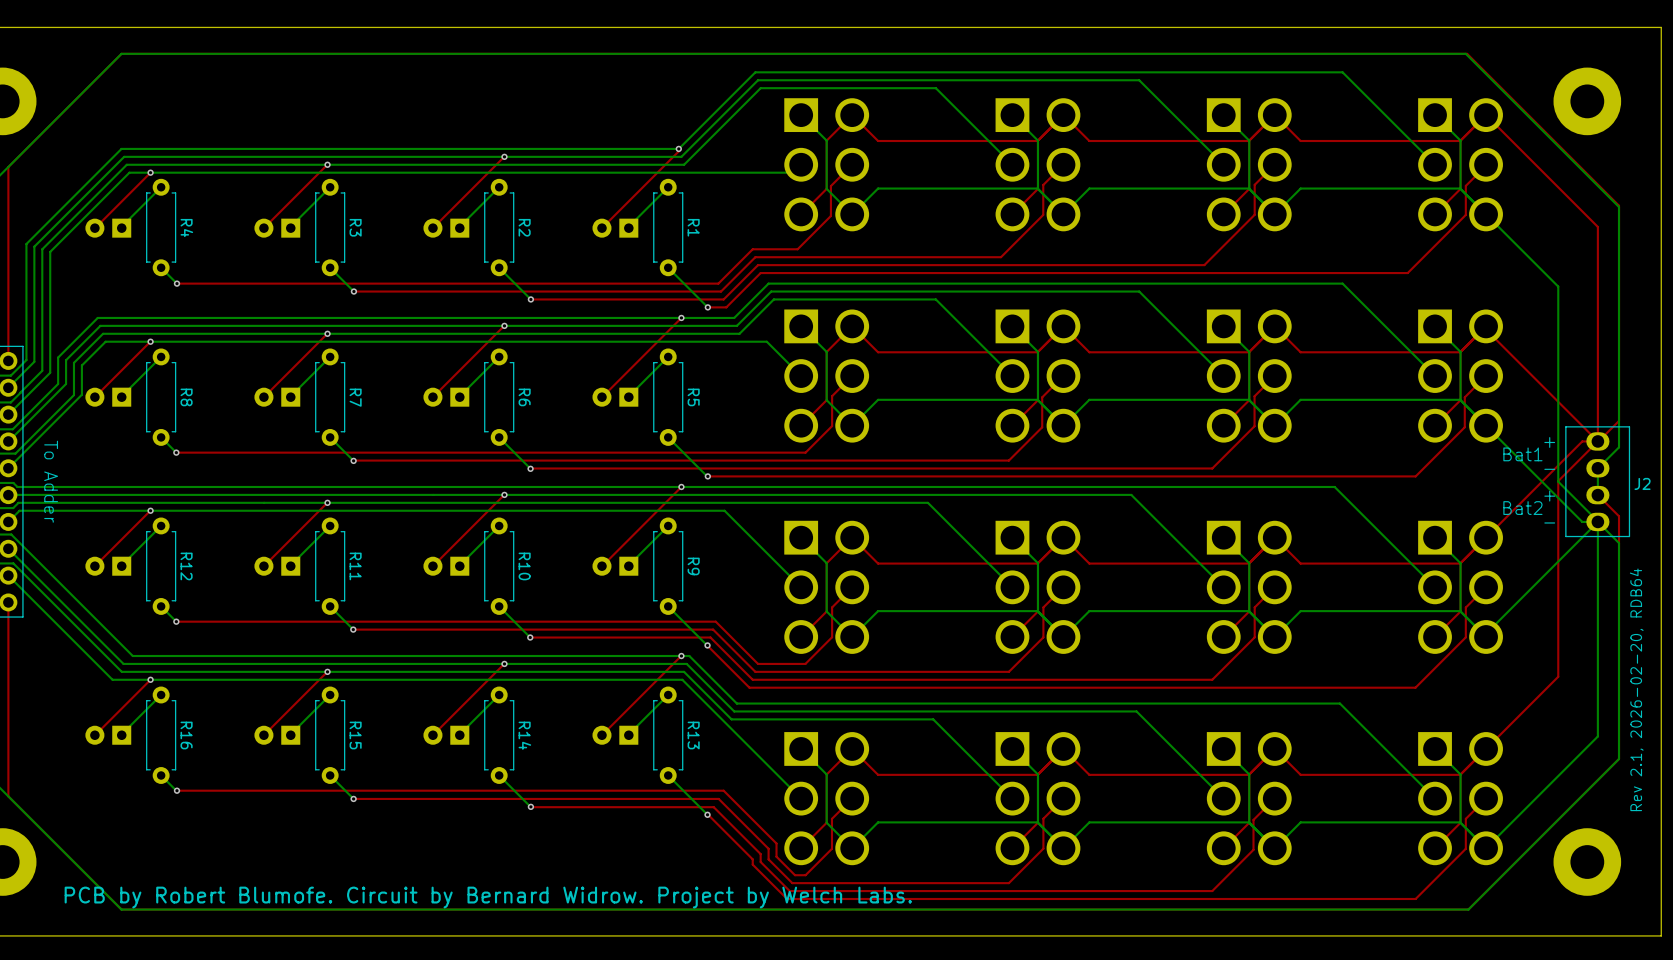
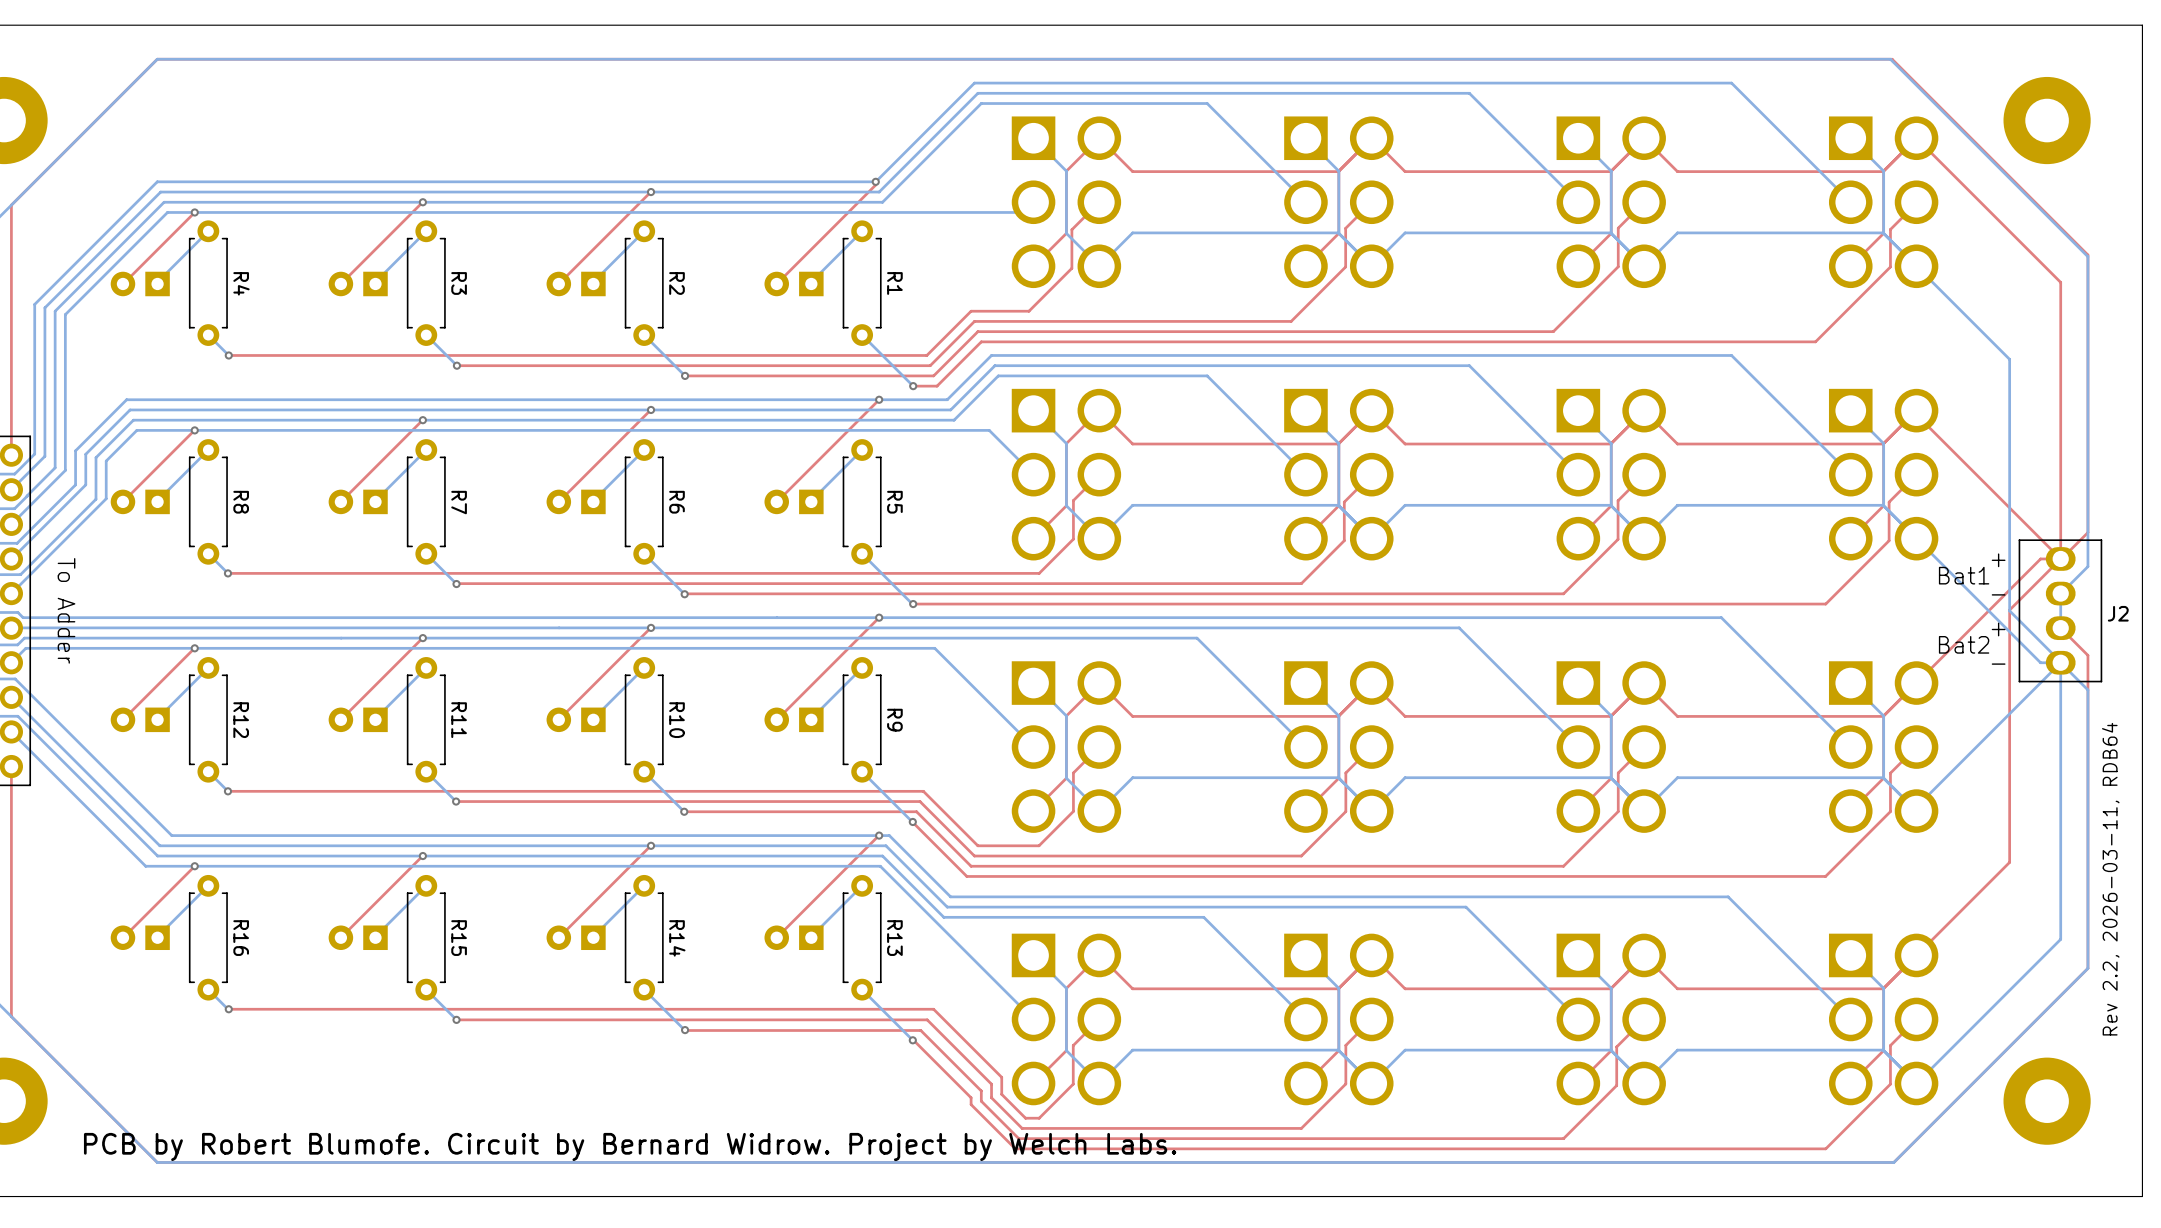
text: Rev 2.1, 2026-02-20, RDB64 (1636, 689) -> Rev 2.2, 2026-03-11, RDB64 (2110, 879)

